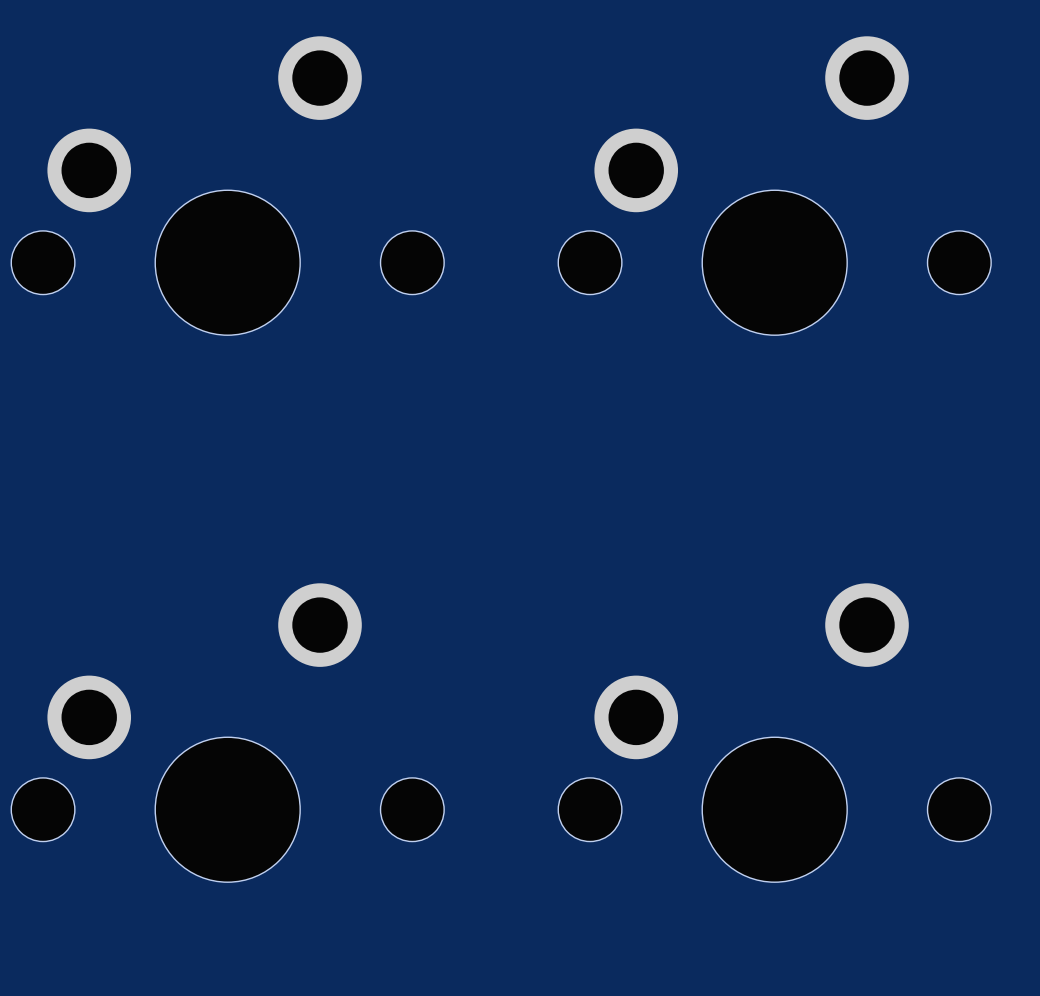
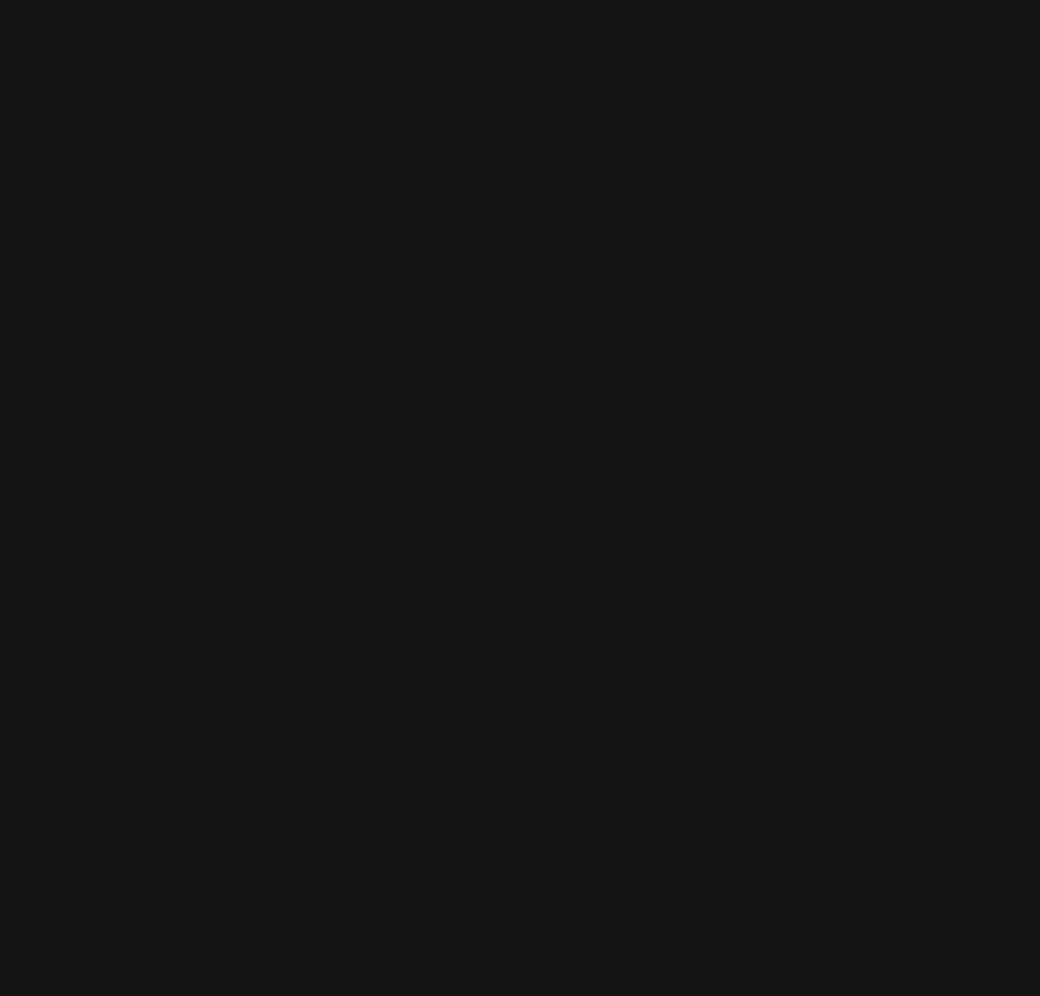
part: (227, 185) -> none
part: (774, 185) -> none
part: (227, 732) -> none
part: (774, 732) -> none

